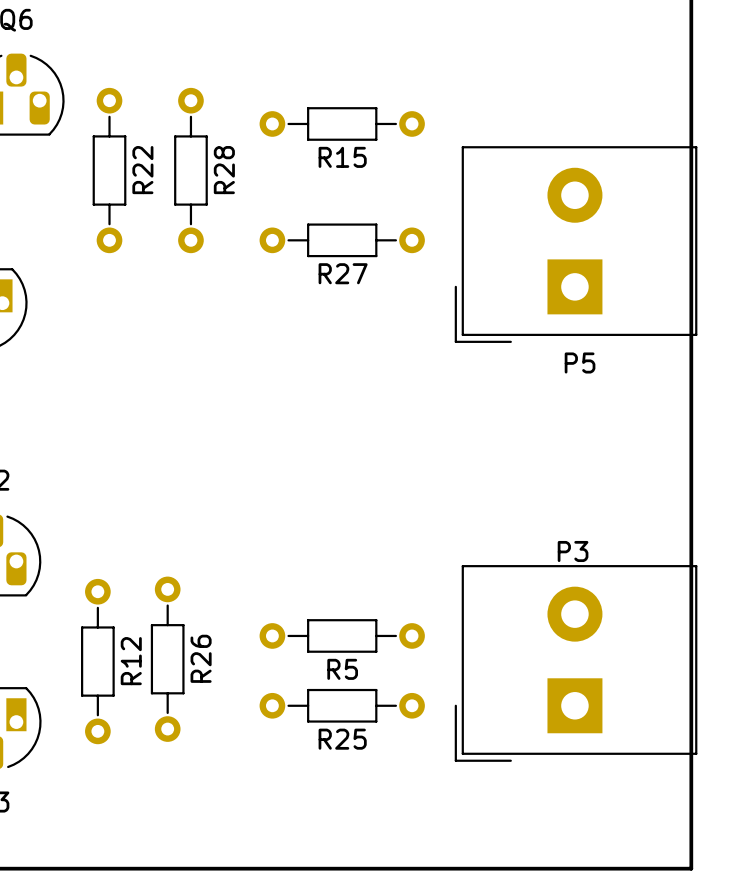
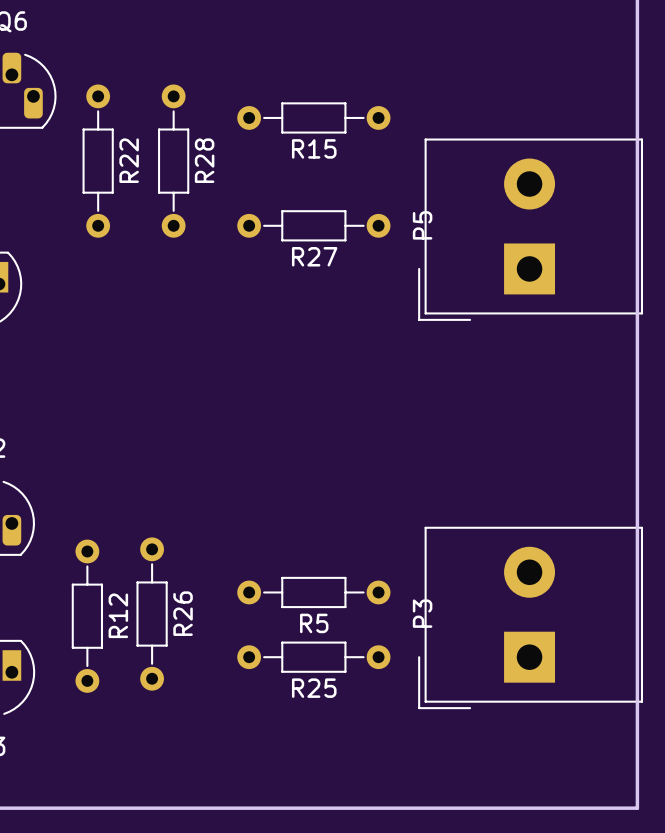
P5 name rotation: 0° (580, 362) -> 90° counterclockwise (422, 225)
P5 name position: P5 (580, 362) -> P5 (422, 225)
P3 name rotation: 0° (573, 551) -> 90° counterclockwise (422, 613)
P3 name position: P3 (573, 551) -> P3 (422, 613)

